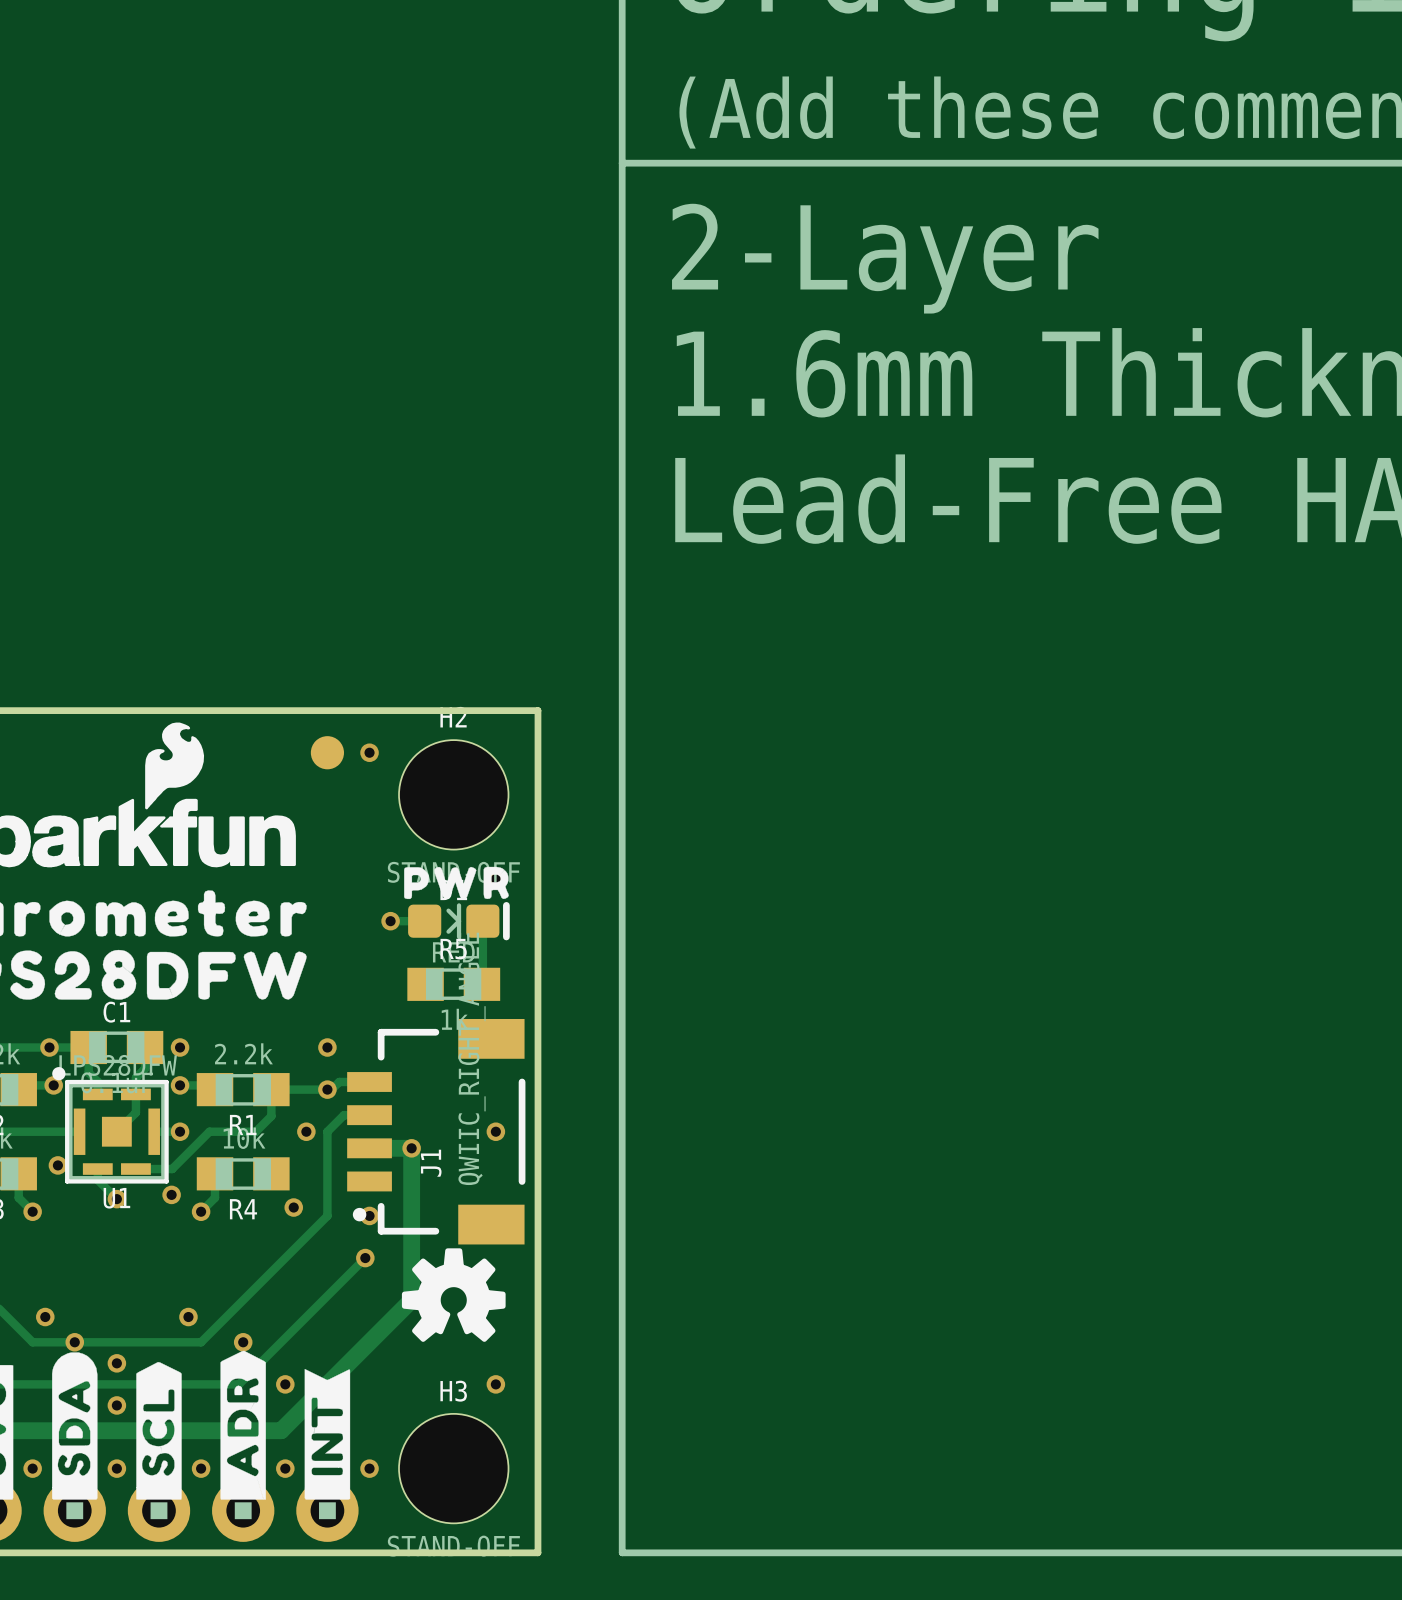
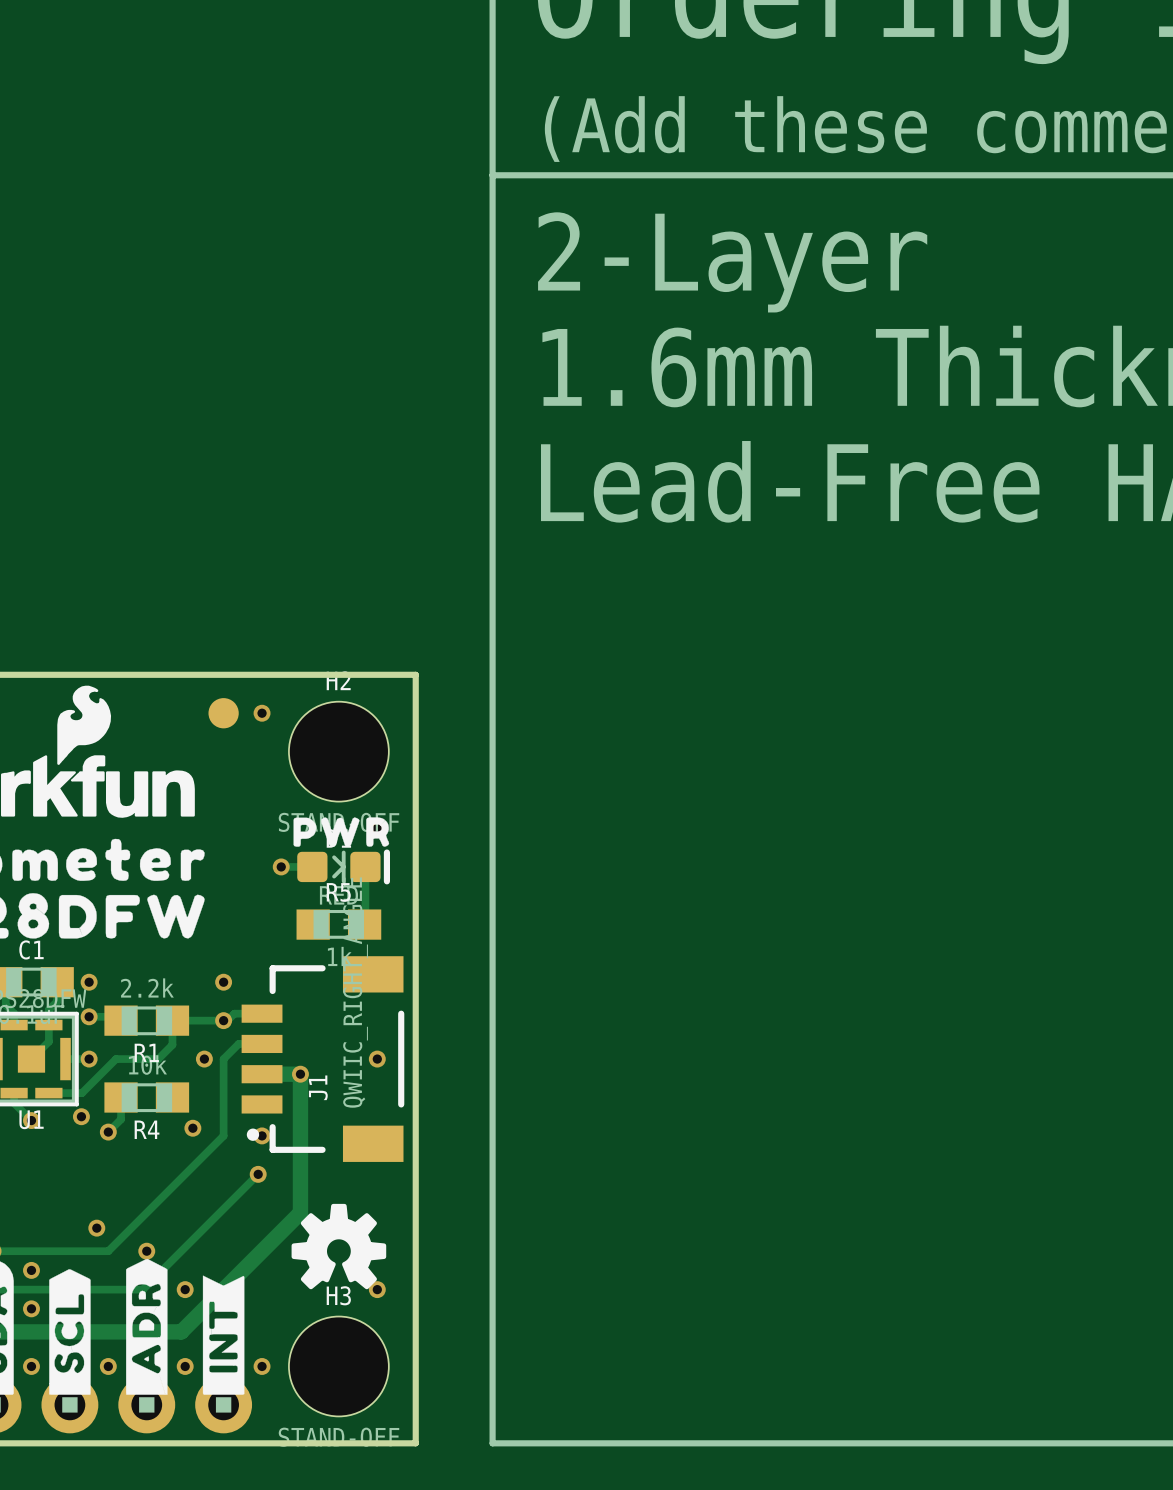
drawing position: (453, 1295) -> (338, 1246)

